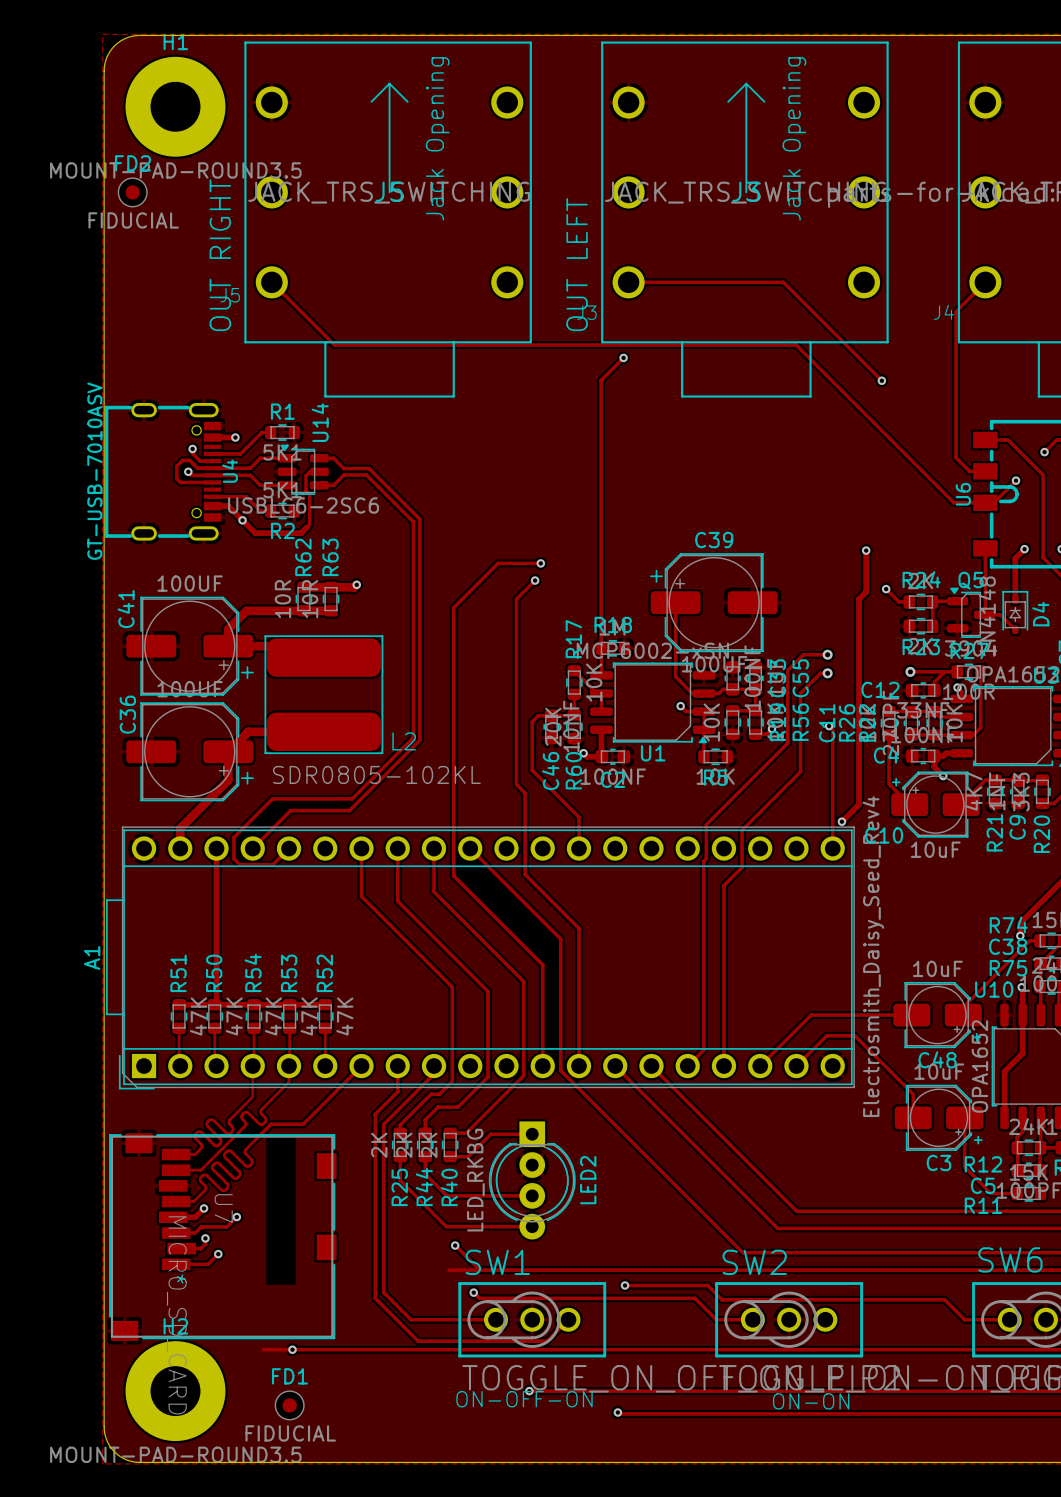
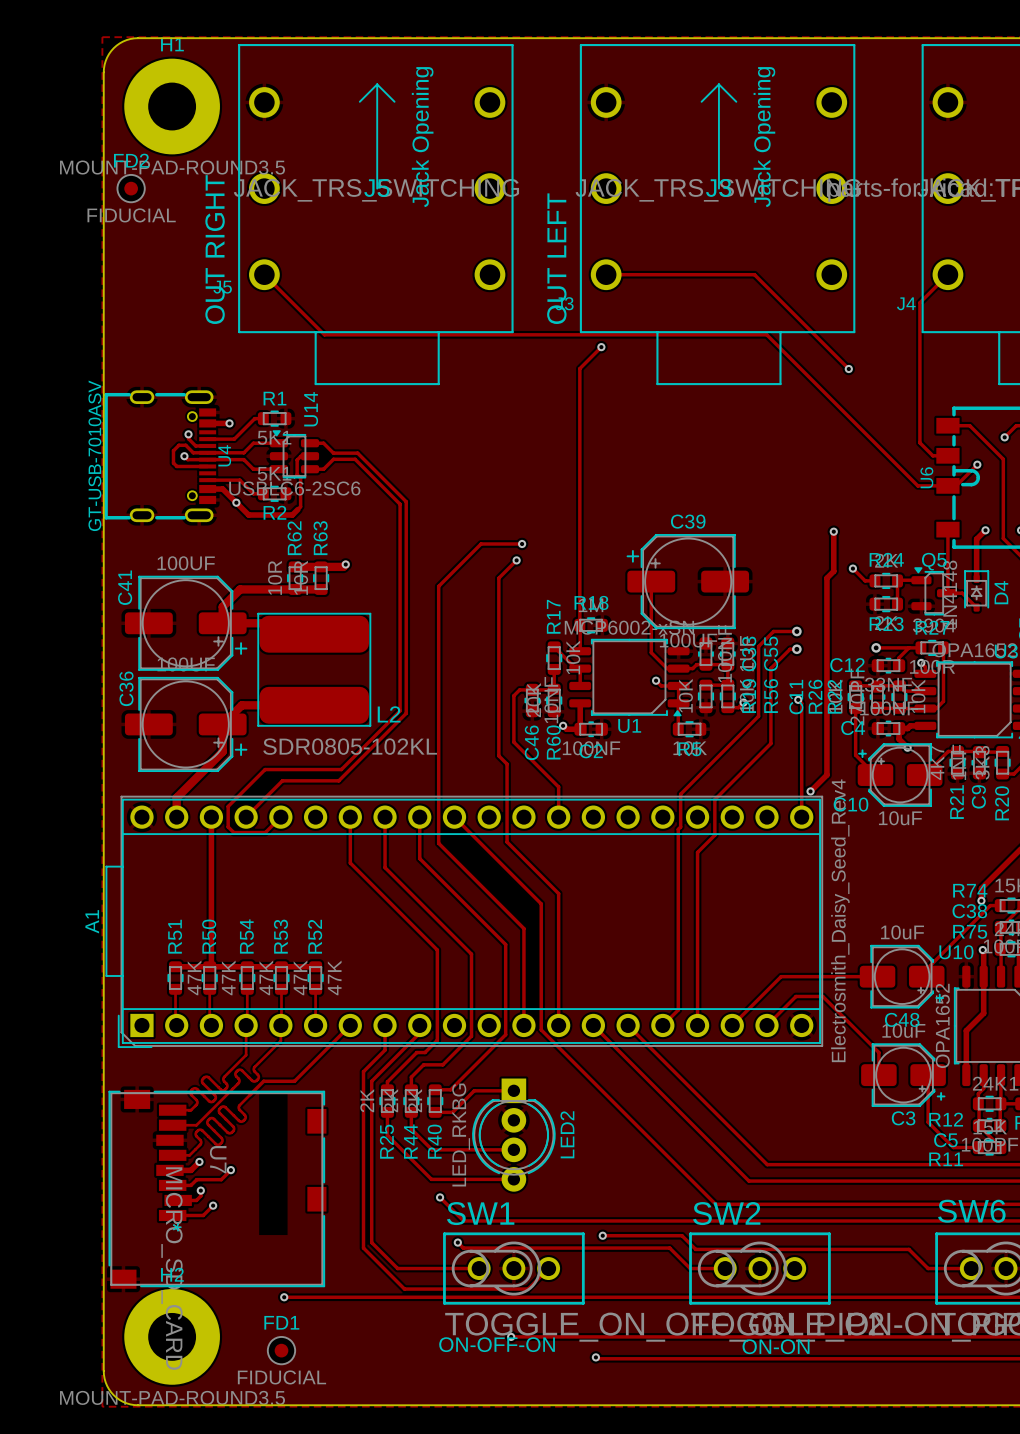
track: (448, 1270) (479, 1270) -> none
track: (263, 1349) (292, 1349) -> none

